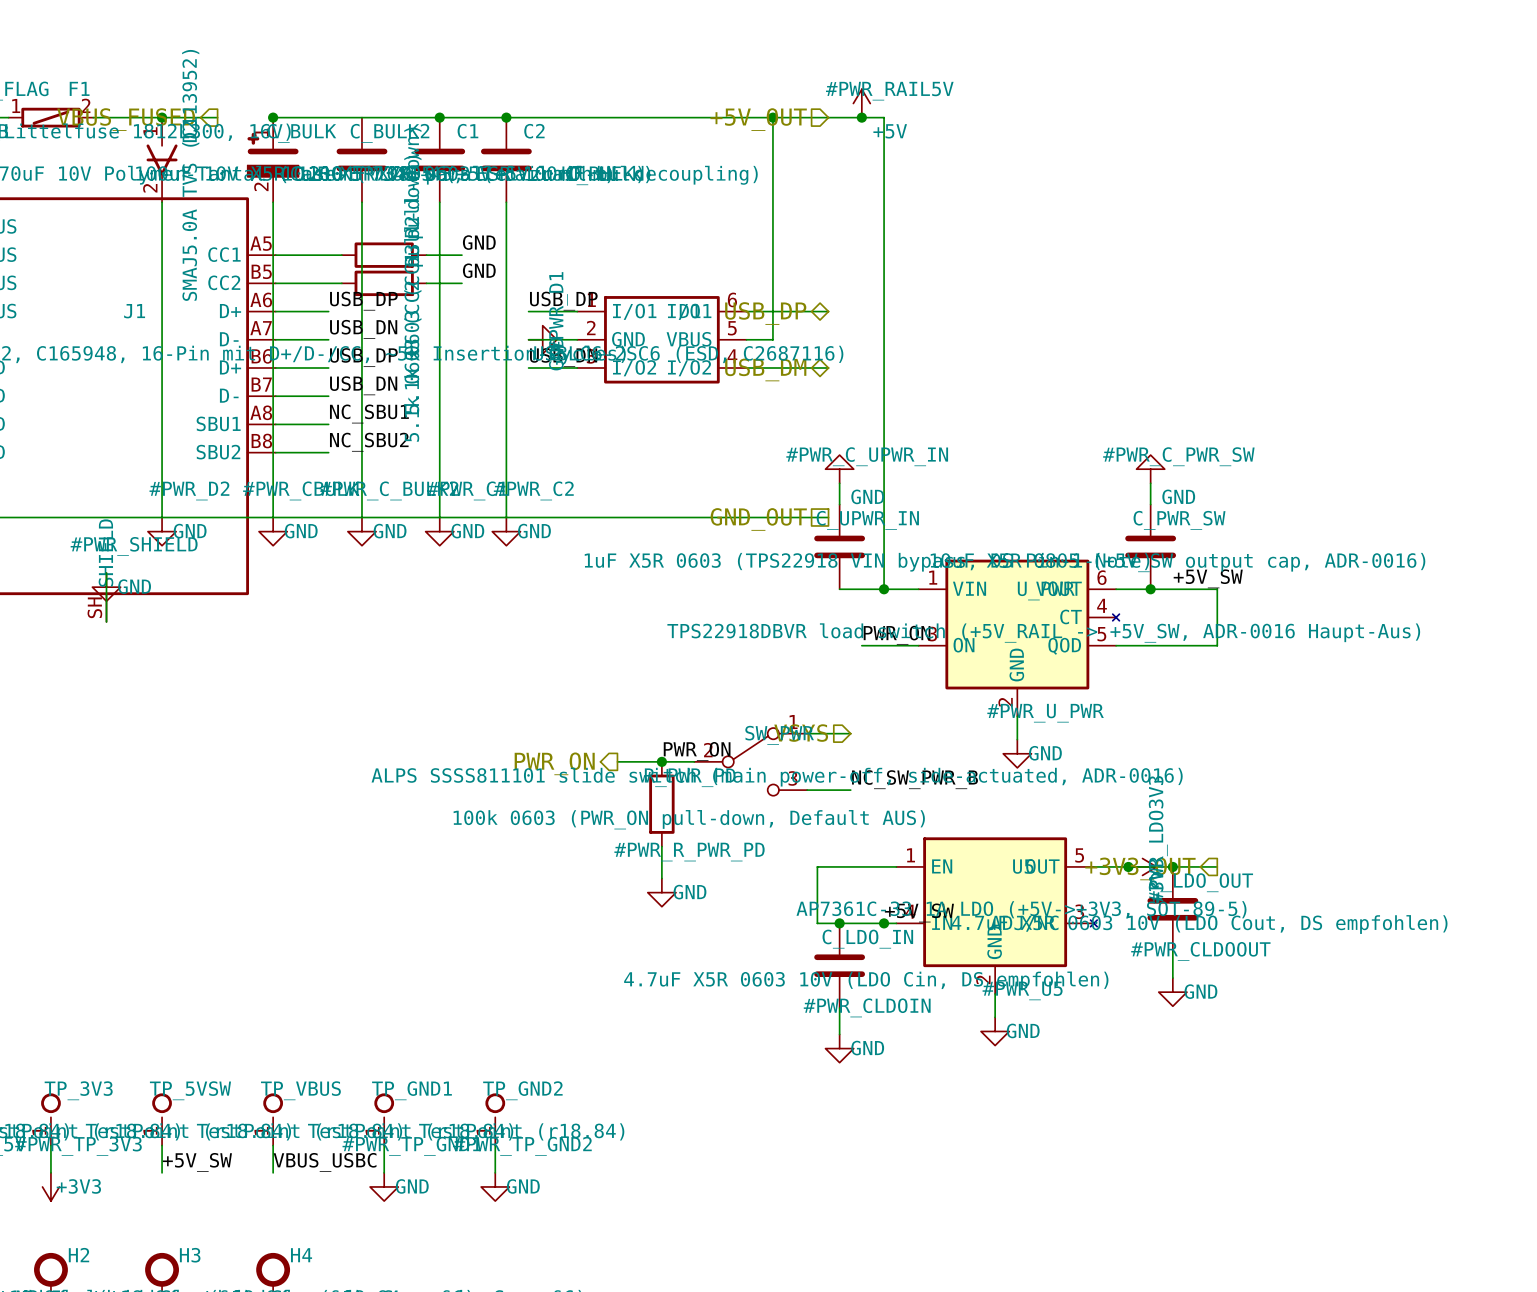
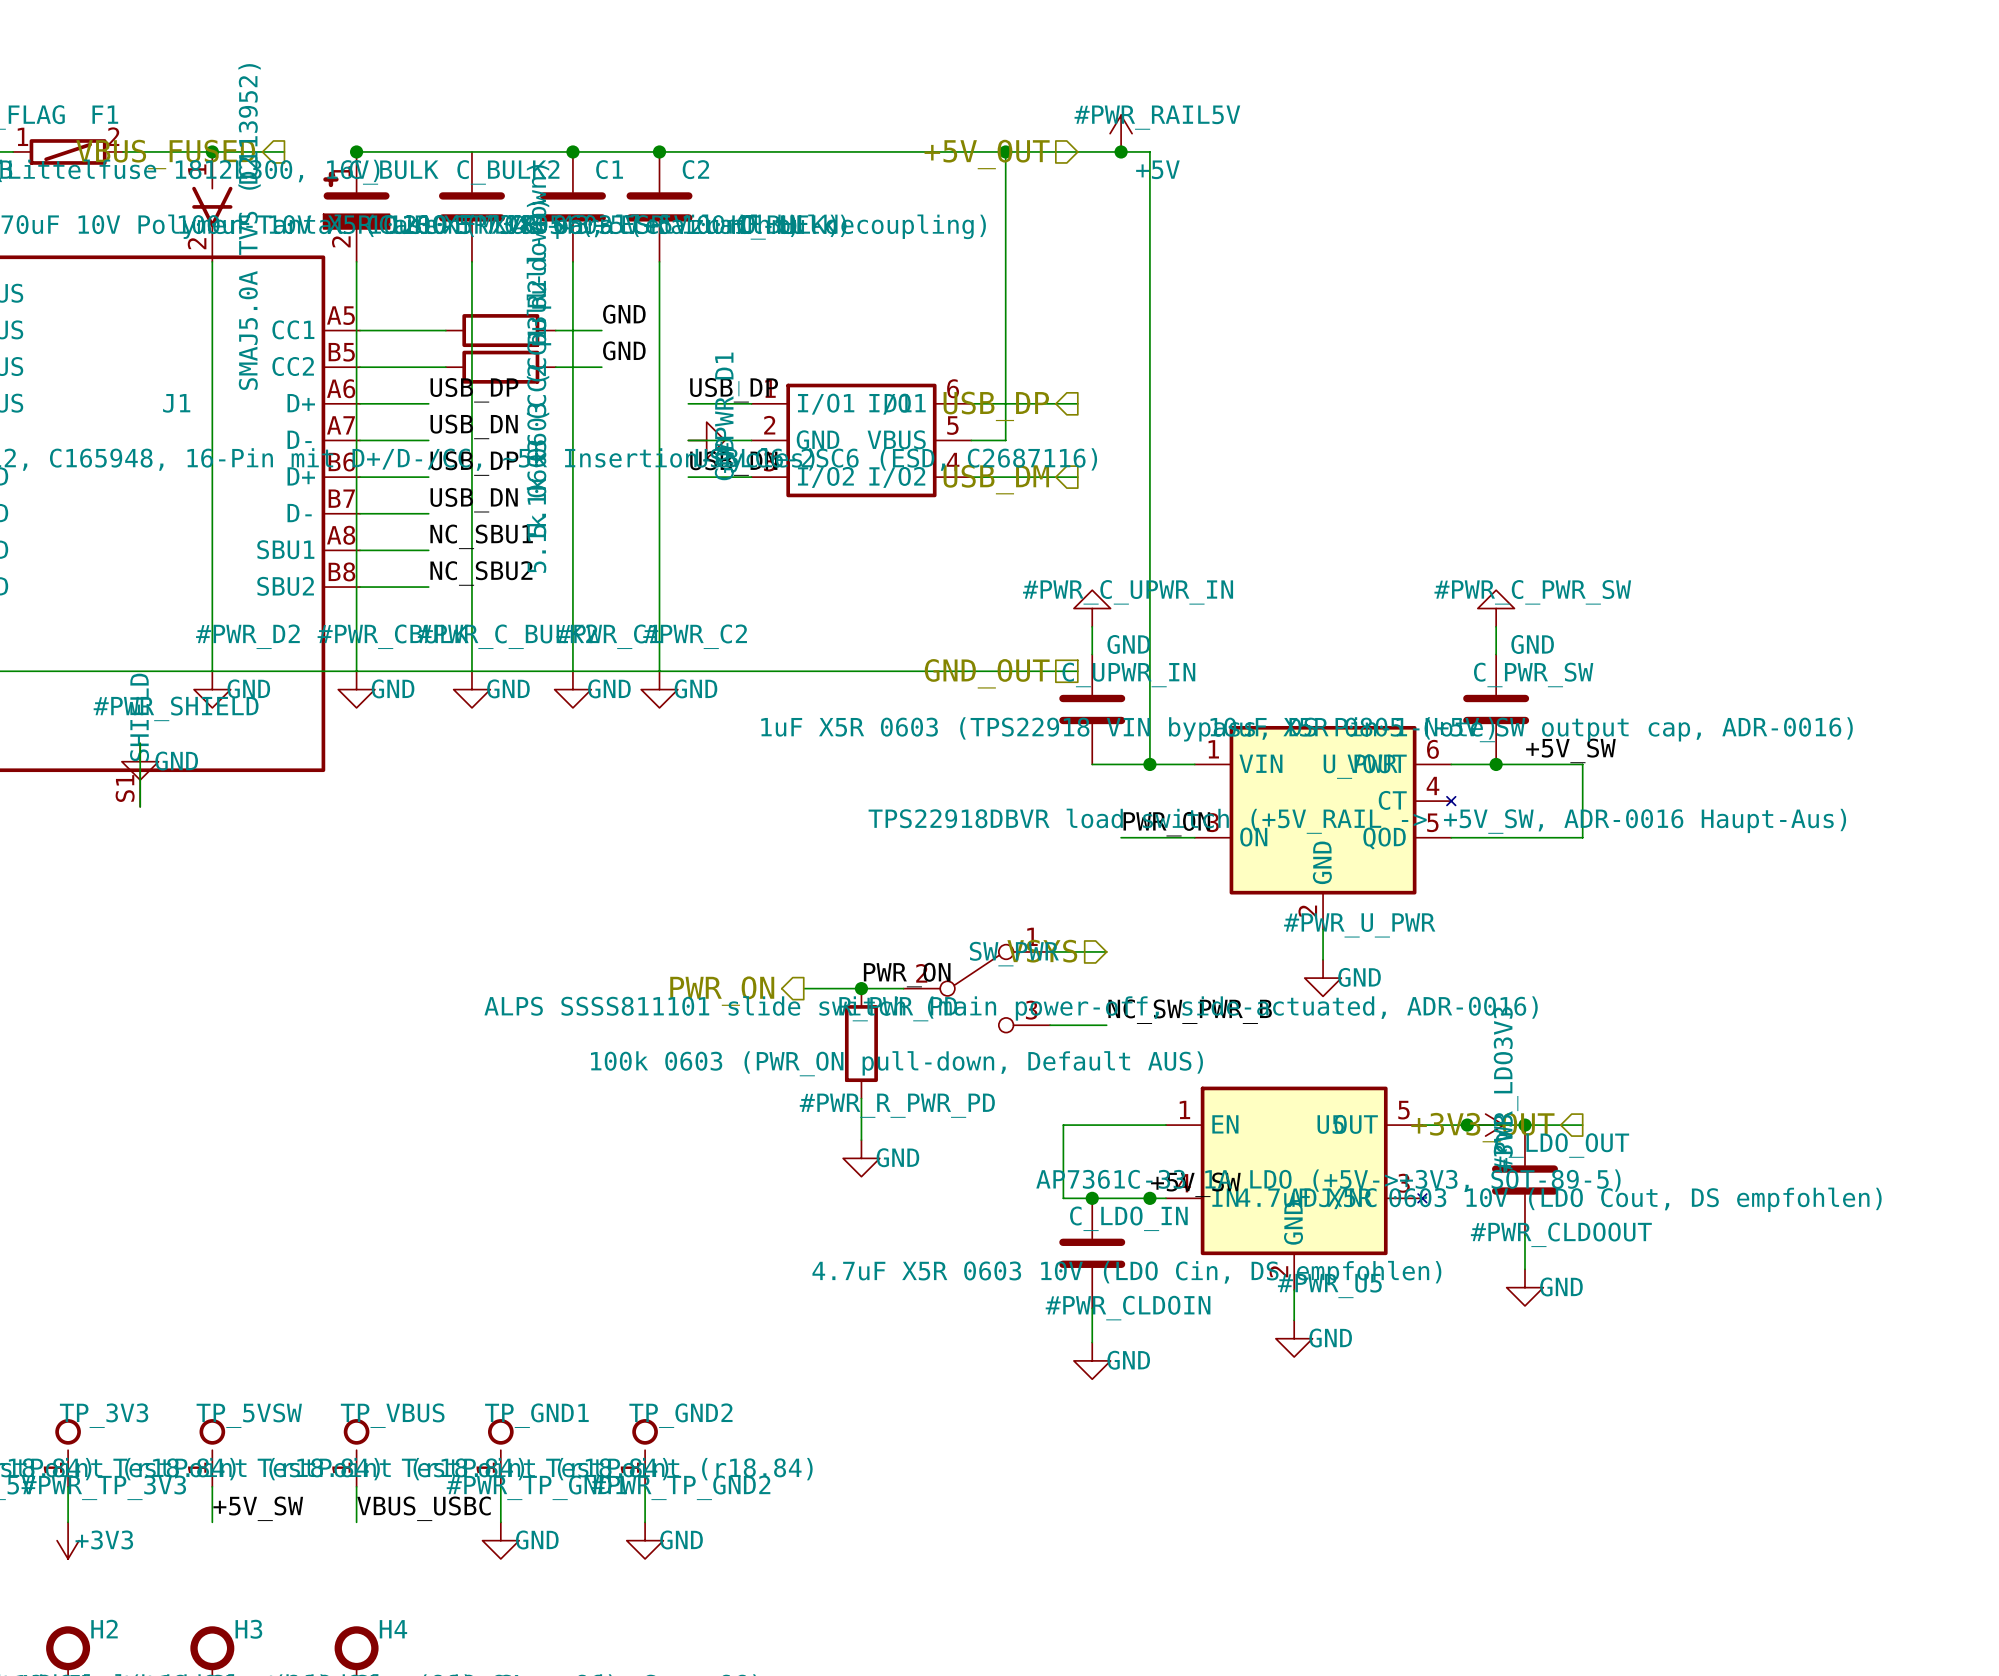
hierarchical label shape: bidirectional (765, 313) -> output (996, 406)
hierarchical label shape: bidirectional (765, 369) -> output (996, 479)
J1 pin number: SH (94, 607) -> S1 (125, 788)

